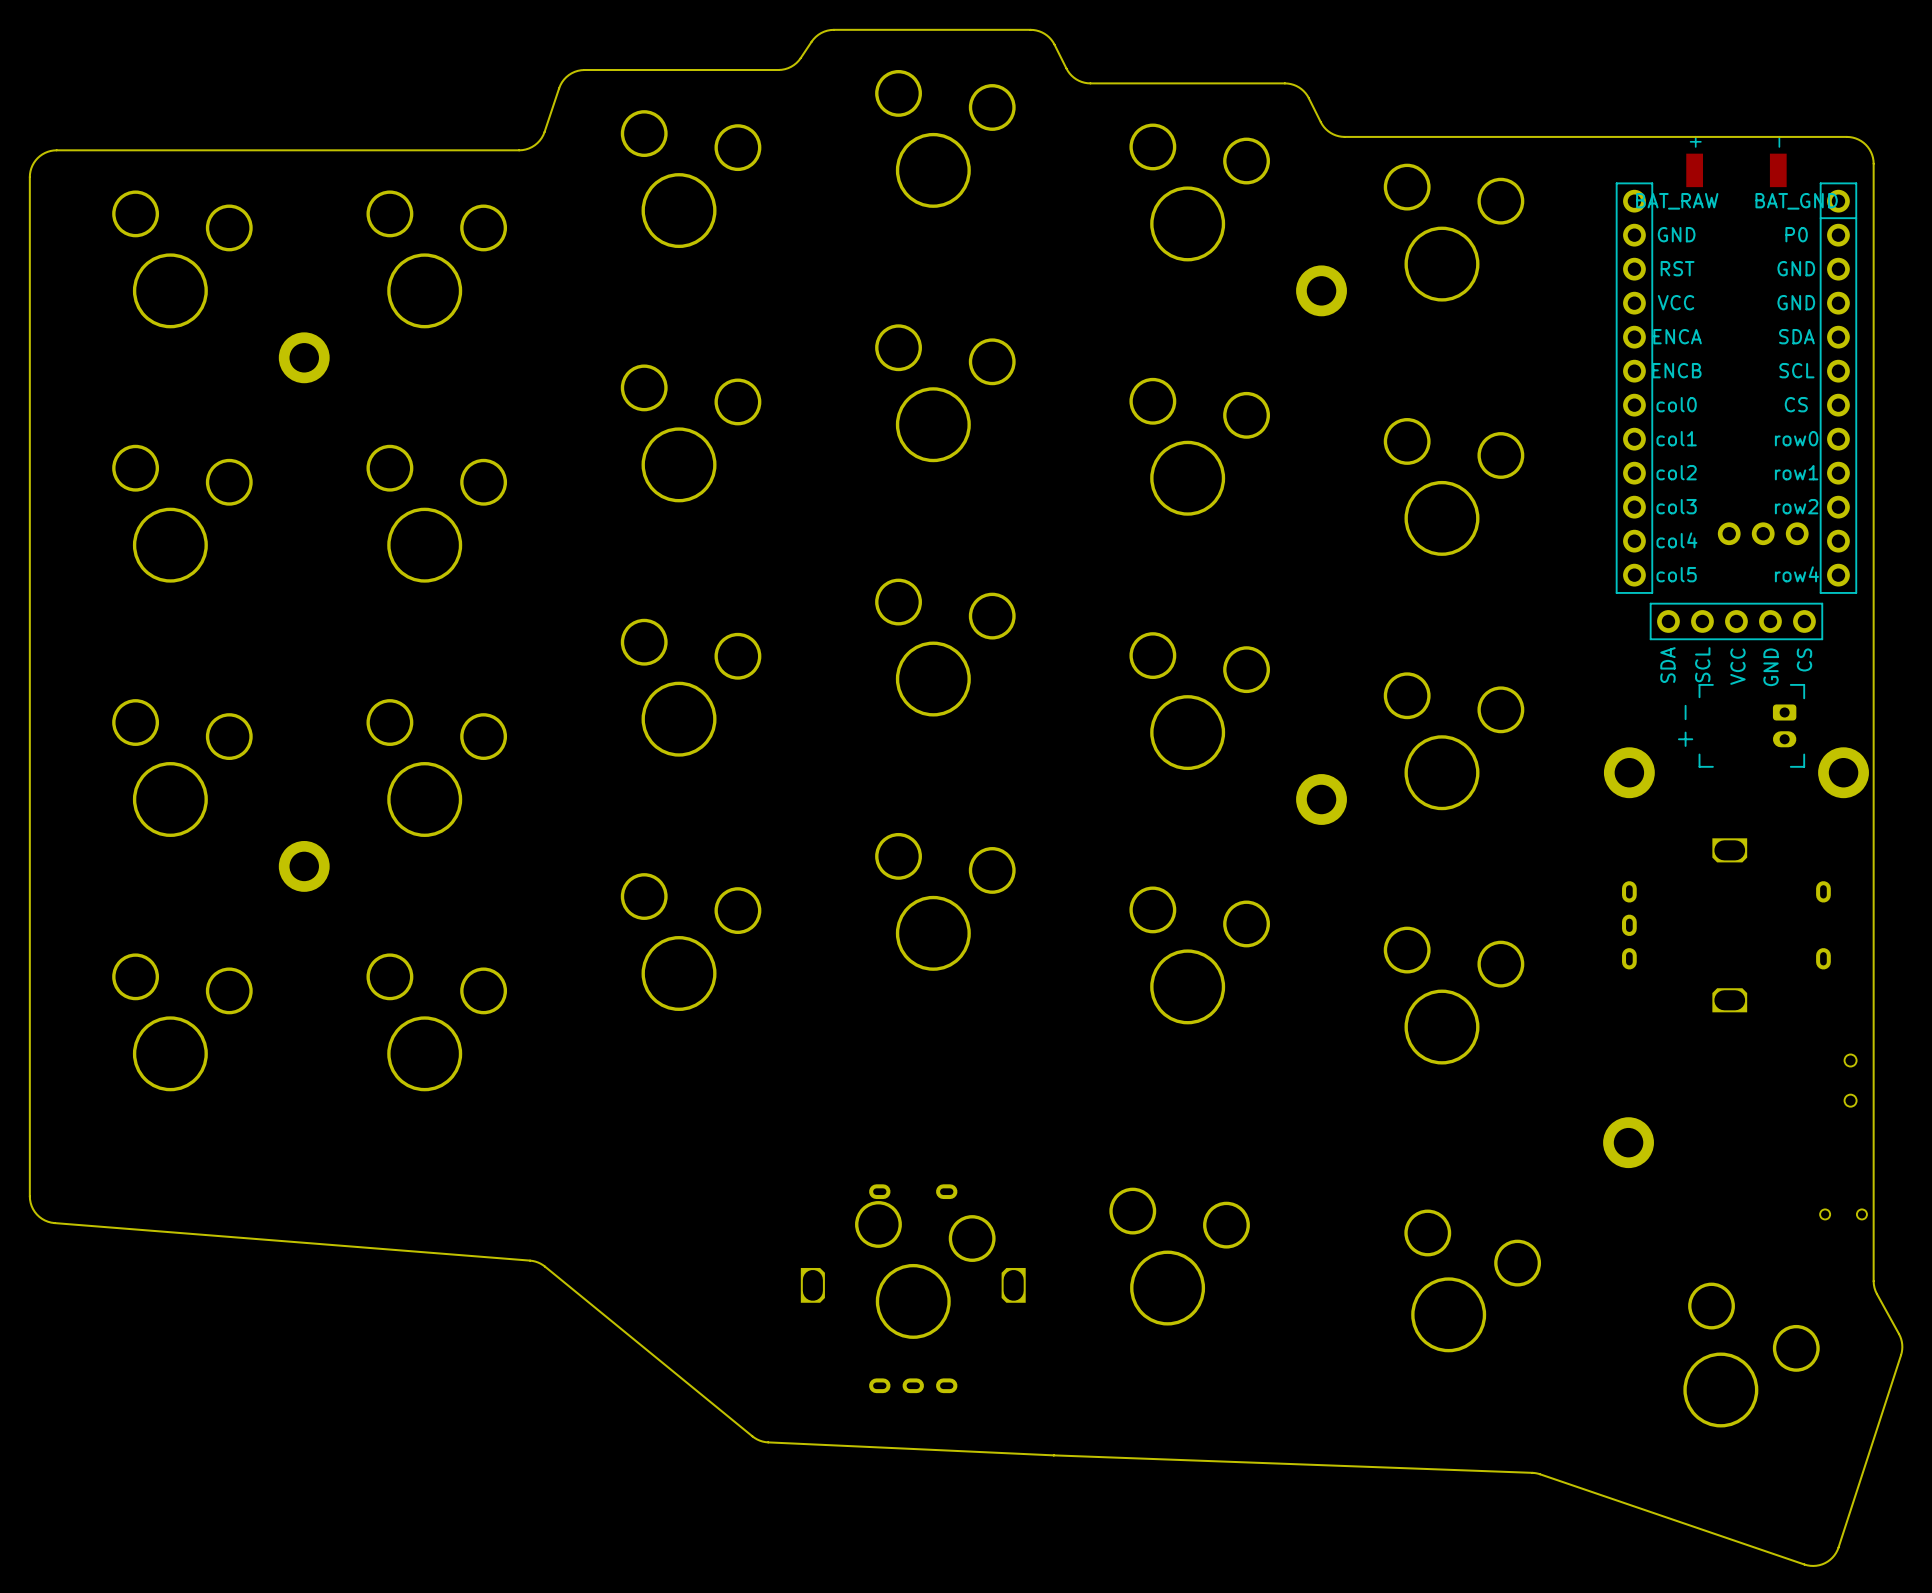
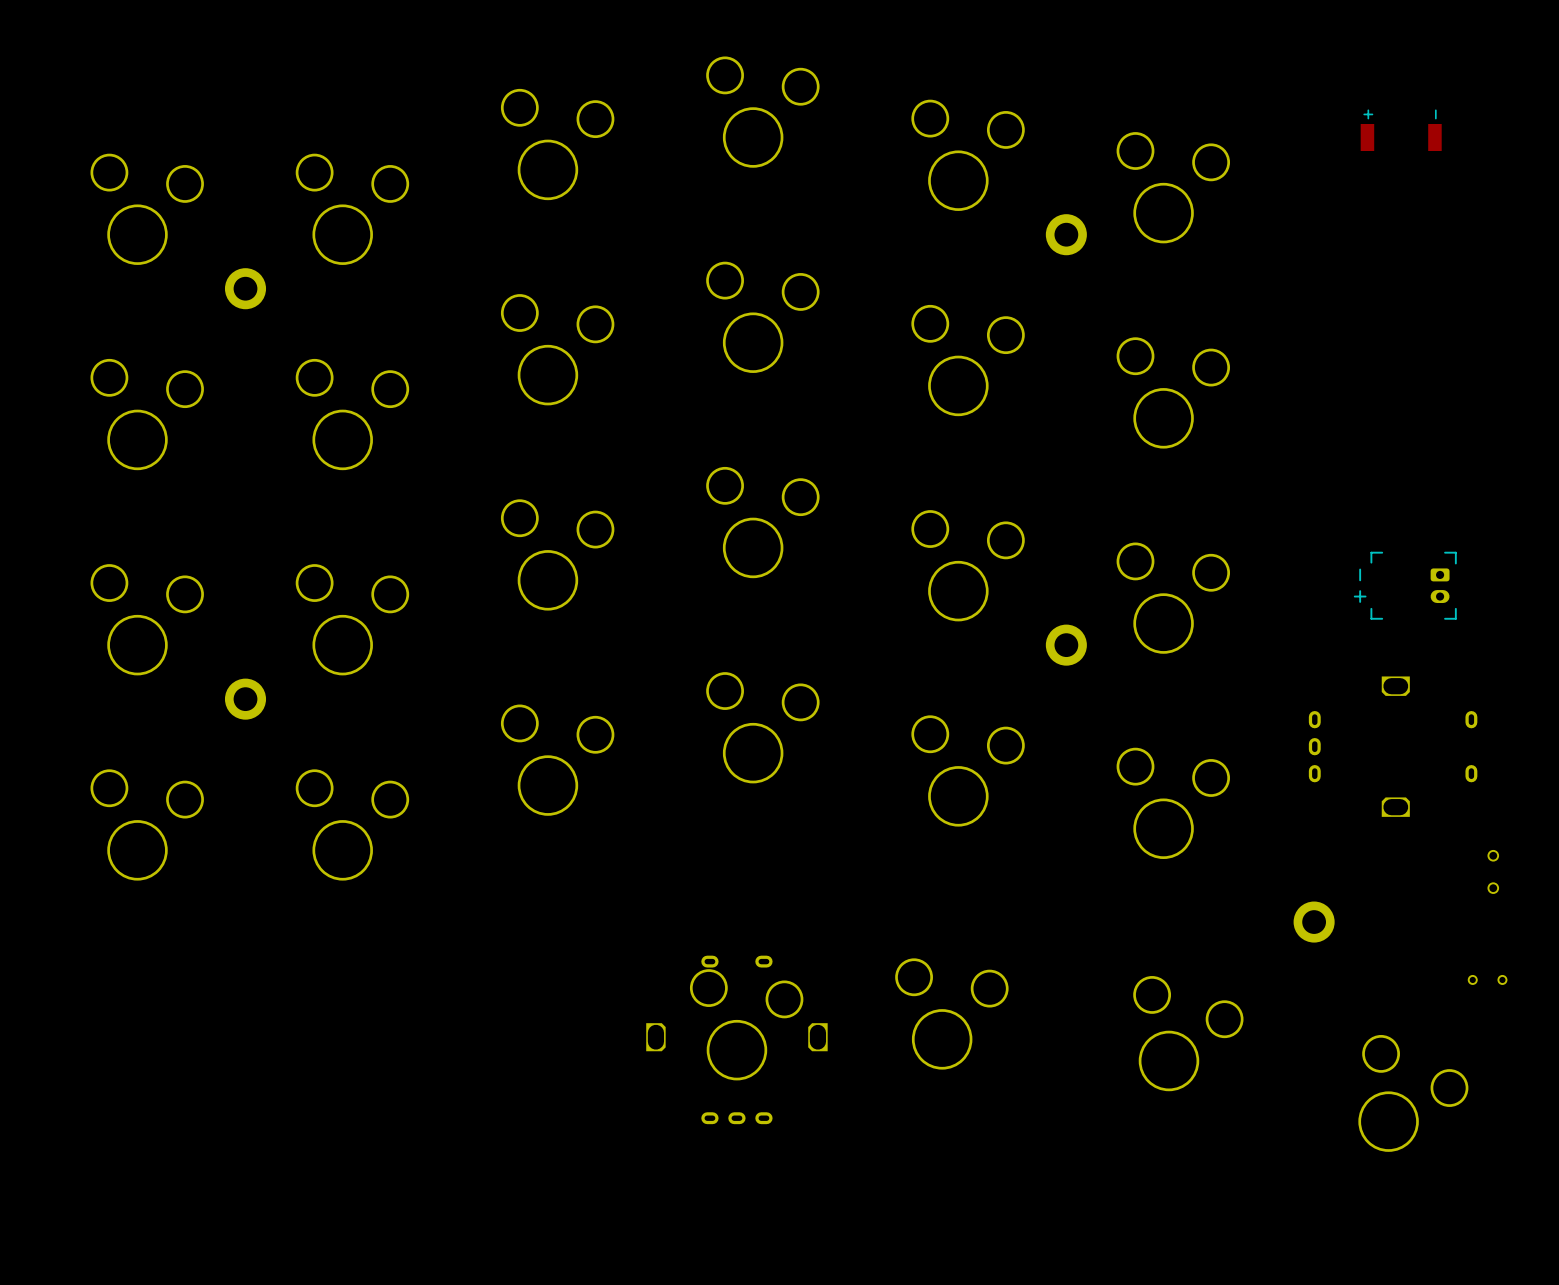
board edge: (833, 29) (1036, 30) (1051, 39) (1067, 71) (1081, 81) (1290, 84) (1305, 93) (1326, 129) (1341, 136) (1846, 136) (1861, 141) (1869, 149) (1873, 163) (1873, 1281) (1876, 1294) (1900, 1336) (1902, 1347) (1838, 1547) (1834, 1555) (1827, 1561) (1816, 1565) (1804, 1564) (1534, 1472) (1053, 1455) (765, 1442) (752, 1436) (544, 1266) (535, 1261) (54, 1223) (42, 1218) (34, 1211) (29, 1196) (29, 177) (33, 162) (45, 152) (56, 150) (522, 150) (534, 145) (541, 138) (560, 85) (566, 77) (574, 71) (584, 70) (781, 69) (796, 63) (818, 34) (833, 29) -> none
part: (1736, 388) -> none
part: (1736, 621) -> none
part: (1629, 772) -> none
part: (1843, 772) -> none

